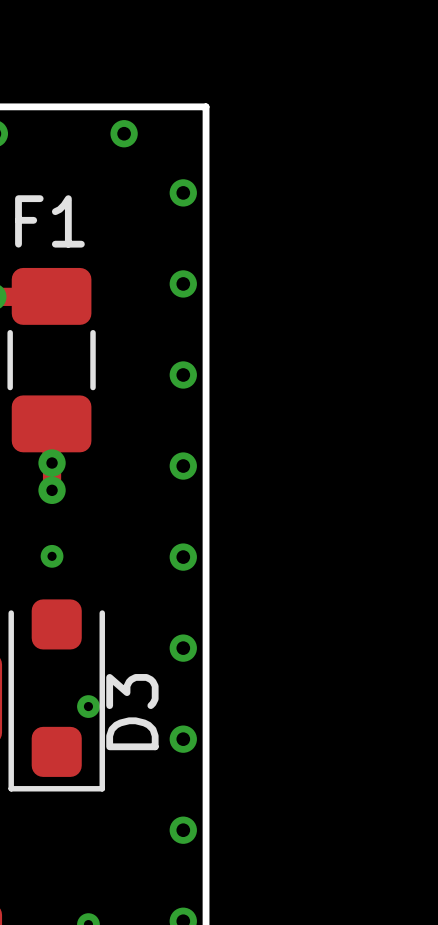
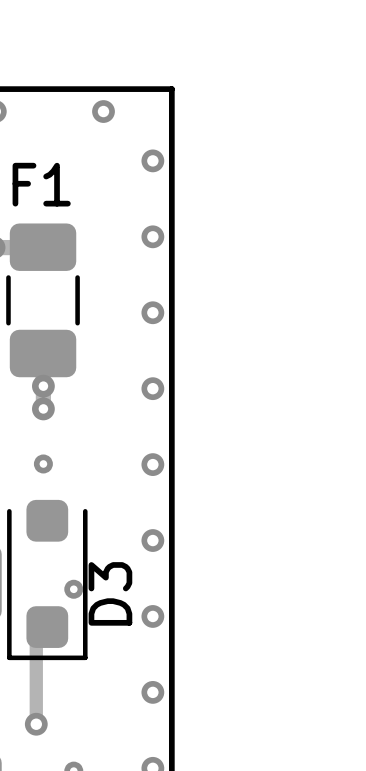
track: none -> (47, 627) (36, 638) (36, 724)
via: none -> (36, 724)

